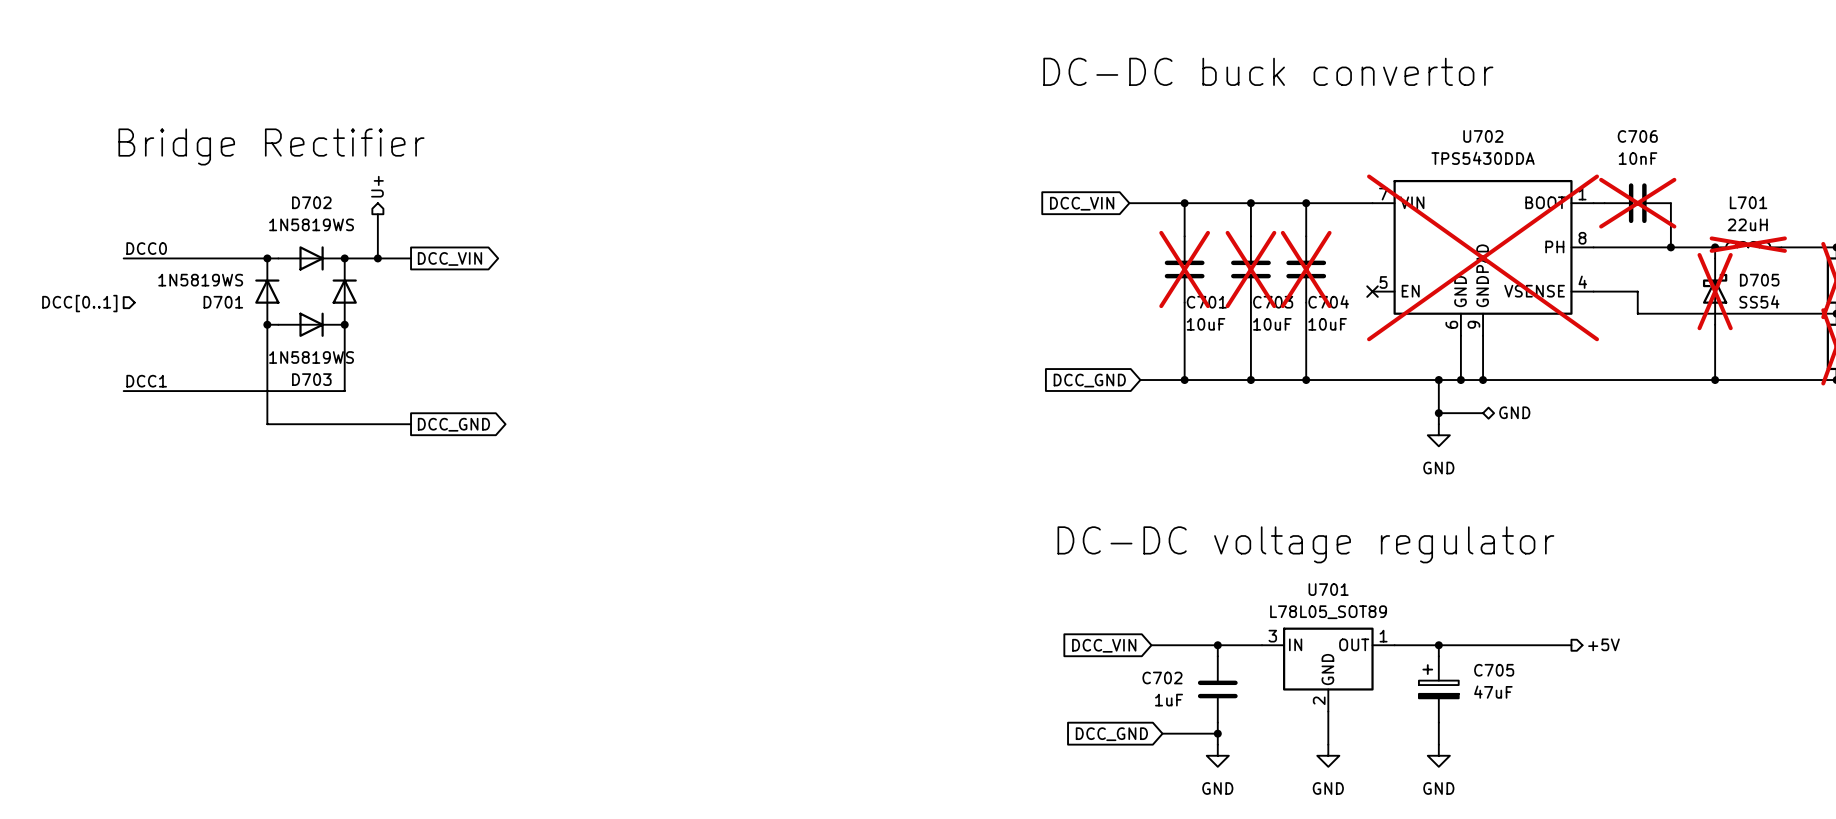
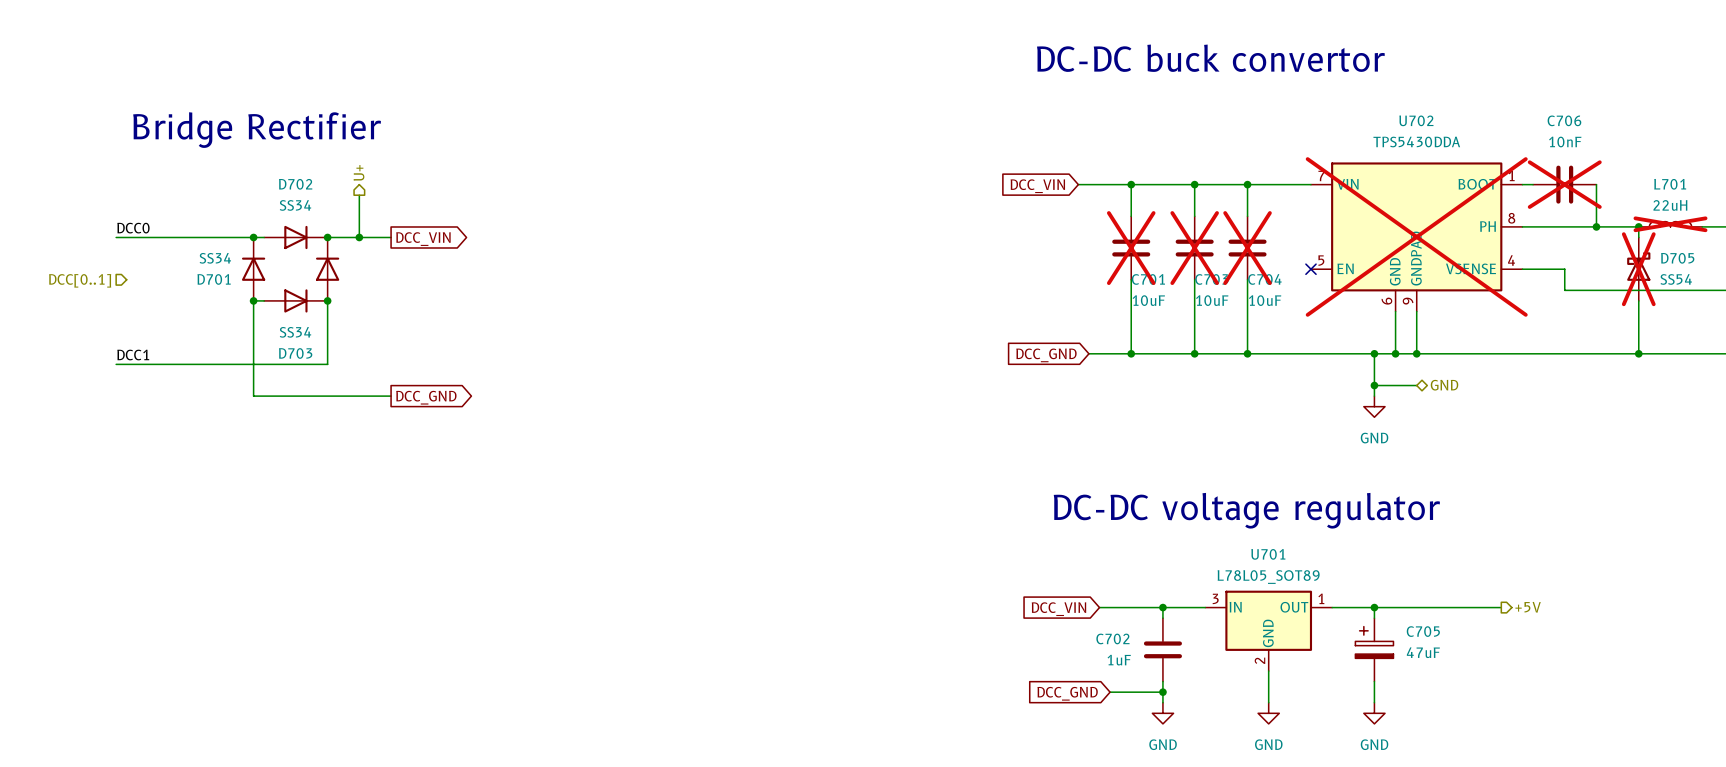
D702 value: 1N5819WS (311, 224) -> SS34 (295, 205)
D701 value: 1N5819WS (200, 280) -> SS34 (215, 258)
D703 value: 1N5819WS (311, 357) -> SS34 (295, 332)

